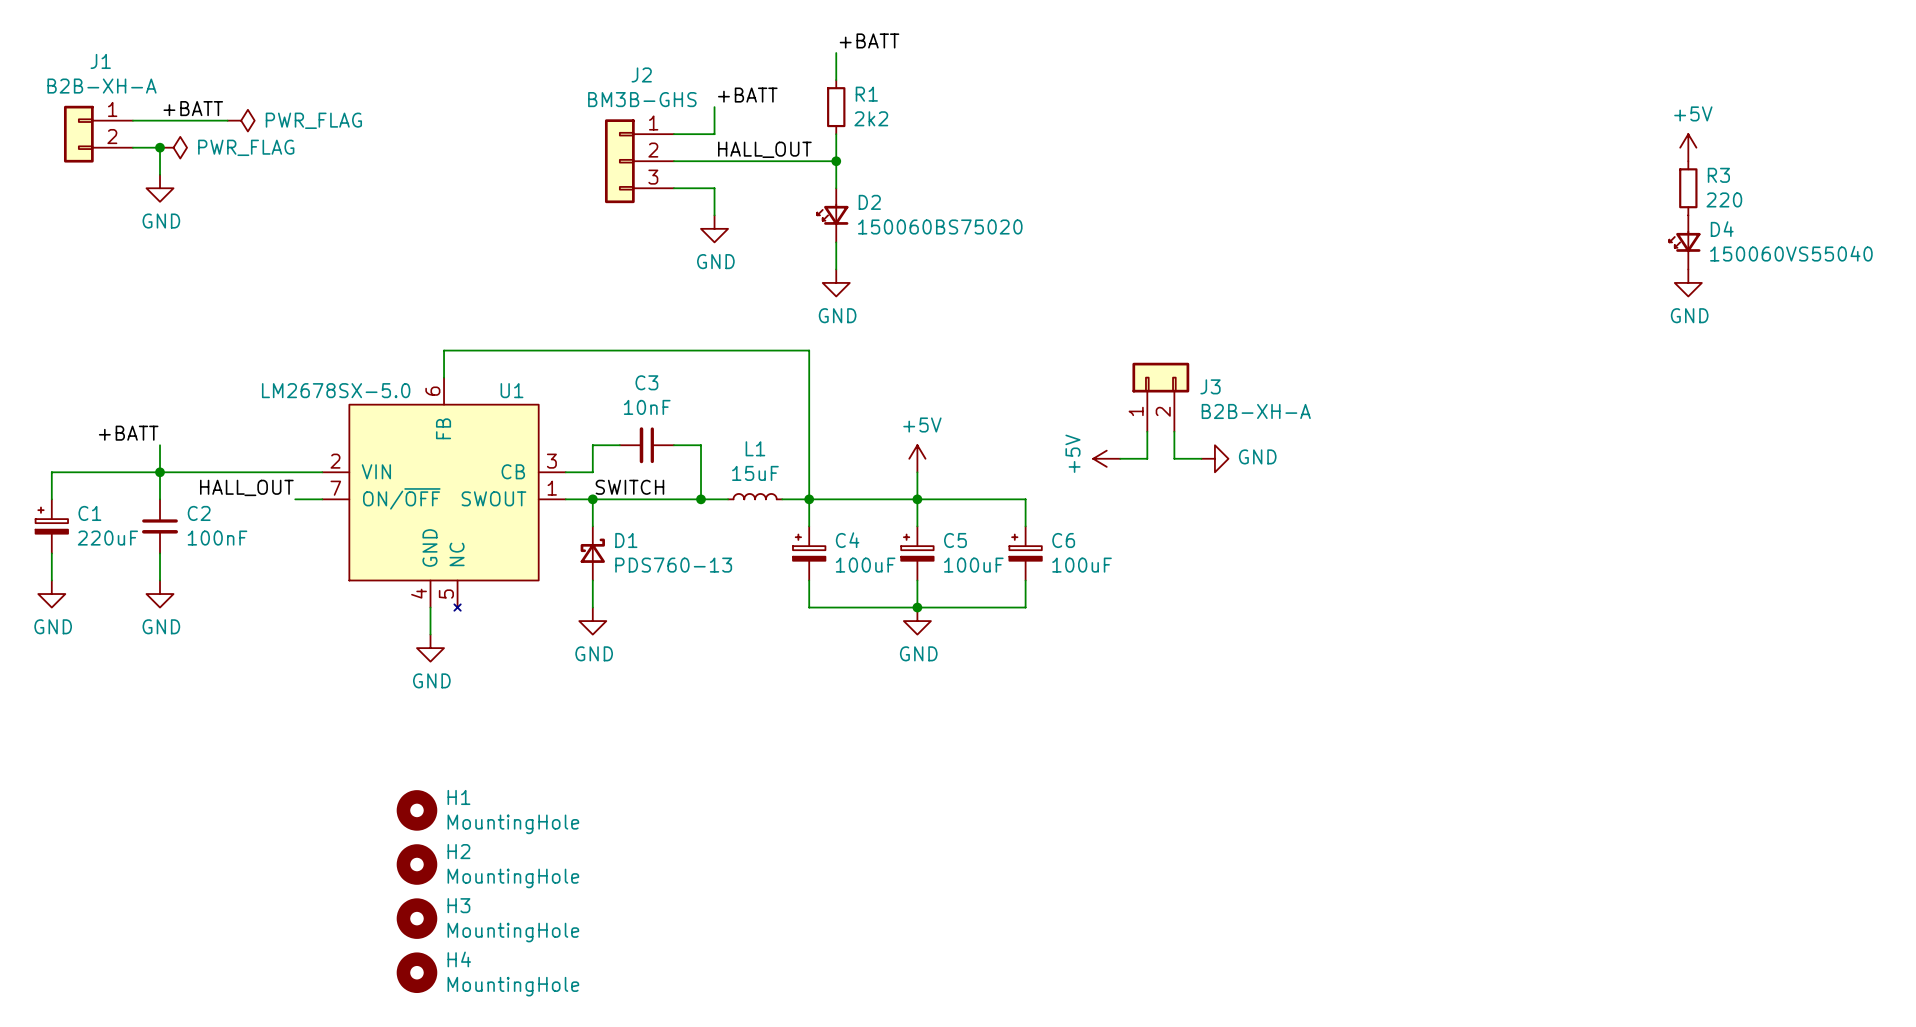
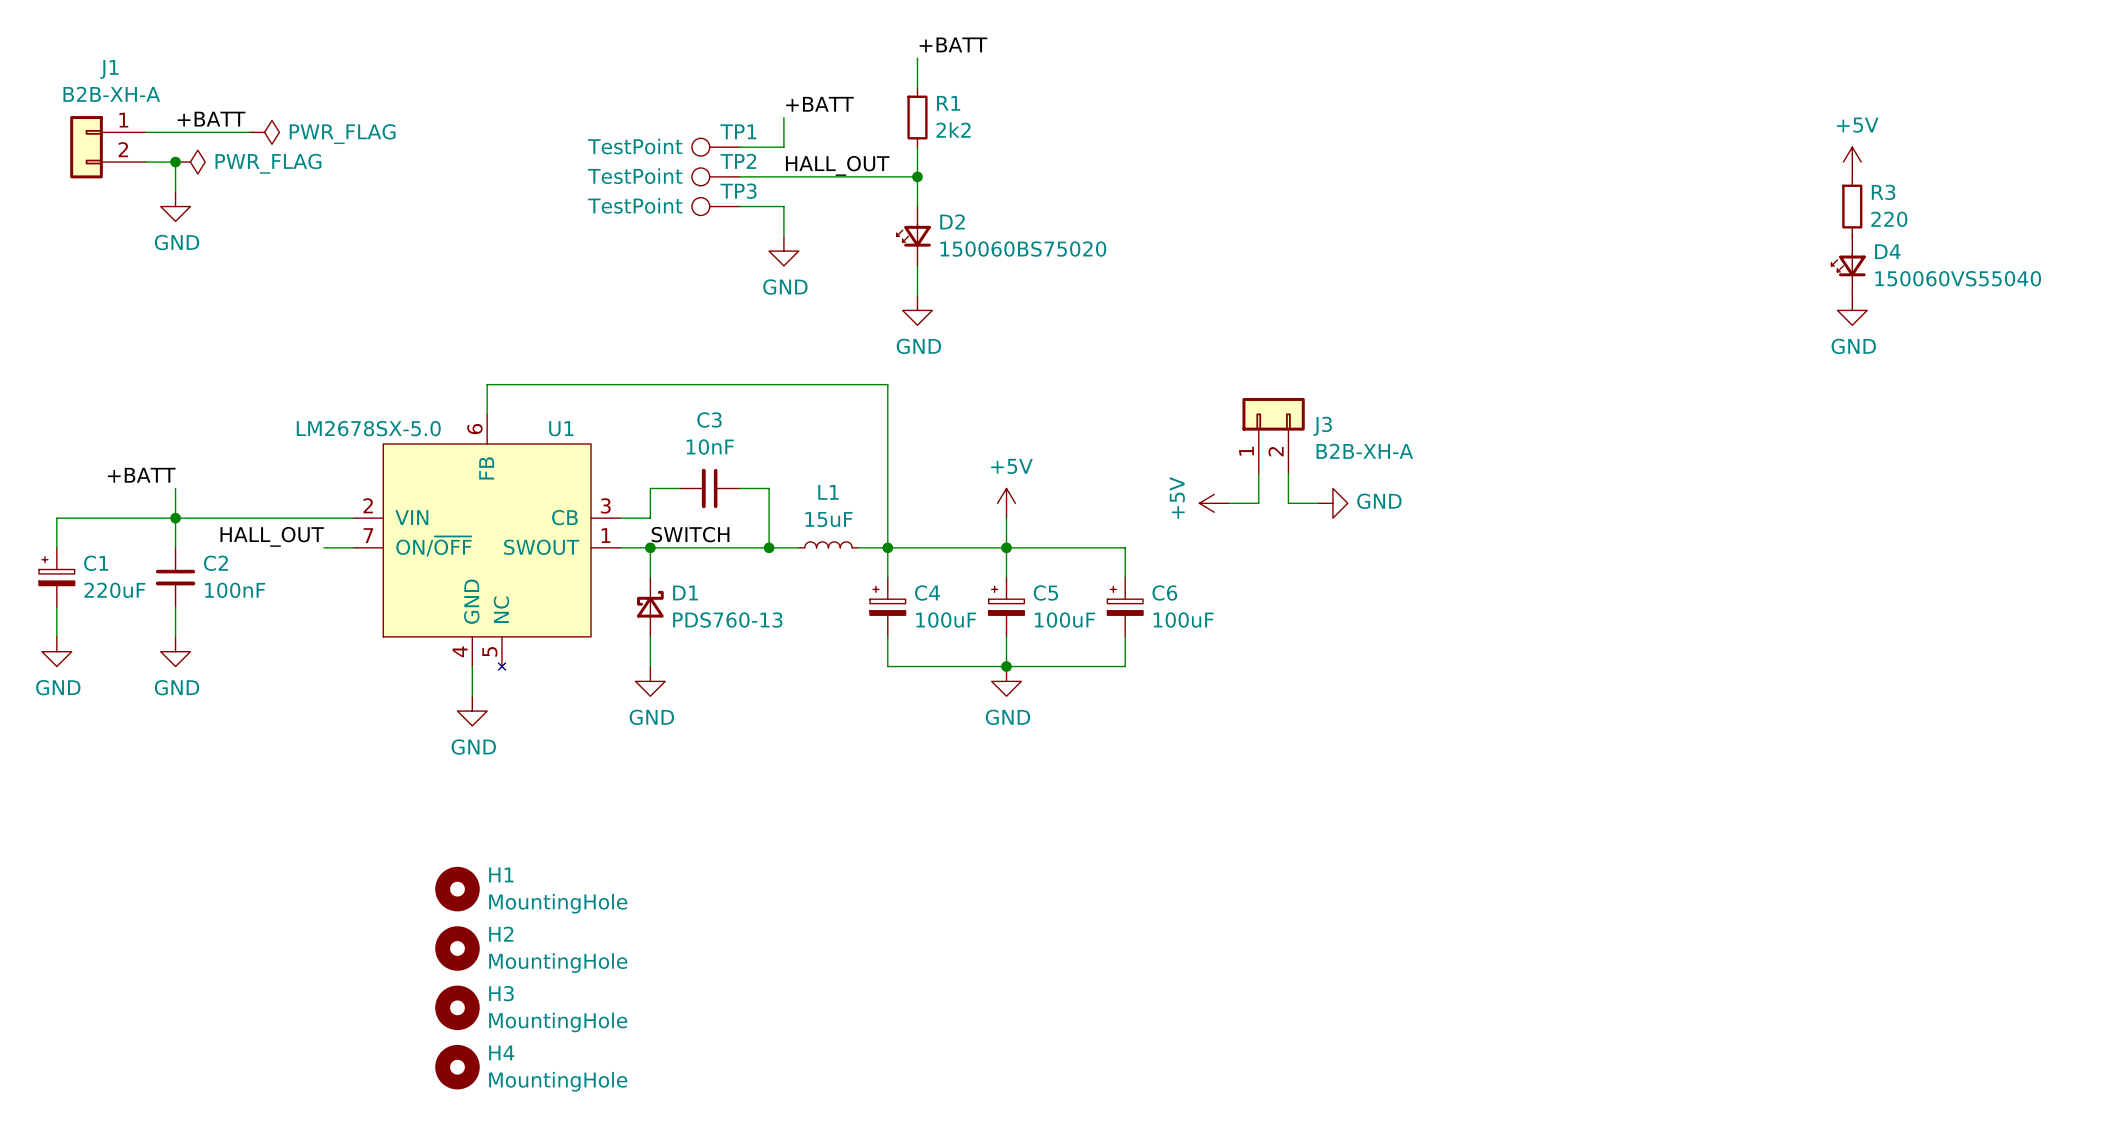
TP1: none -> TestPoint (715, 147)
J2: BM3B-GHS (639, 161) -> none
TP2: none -> TestPoint (715, 176)
TP3: none -> TestPoint (715, 206)

